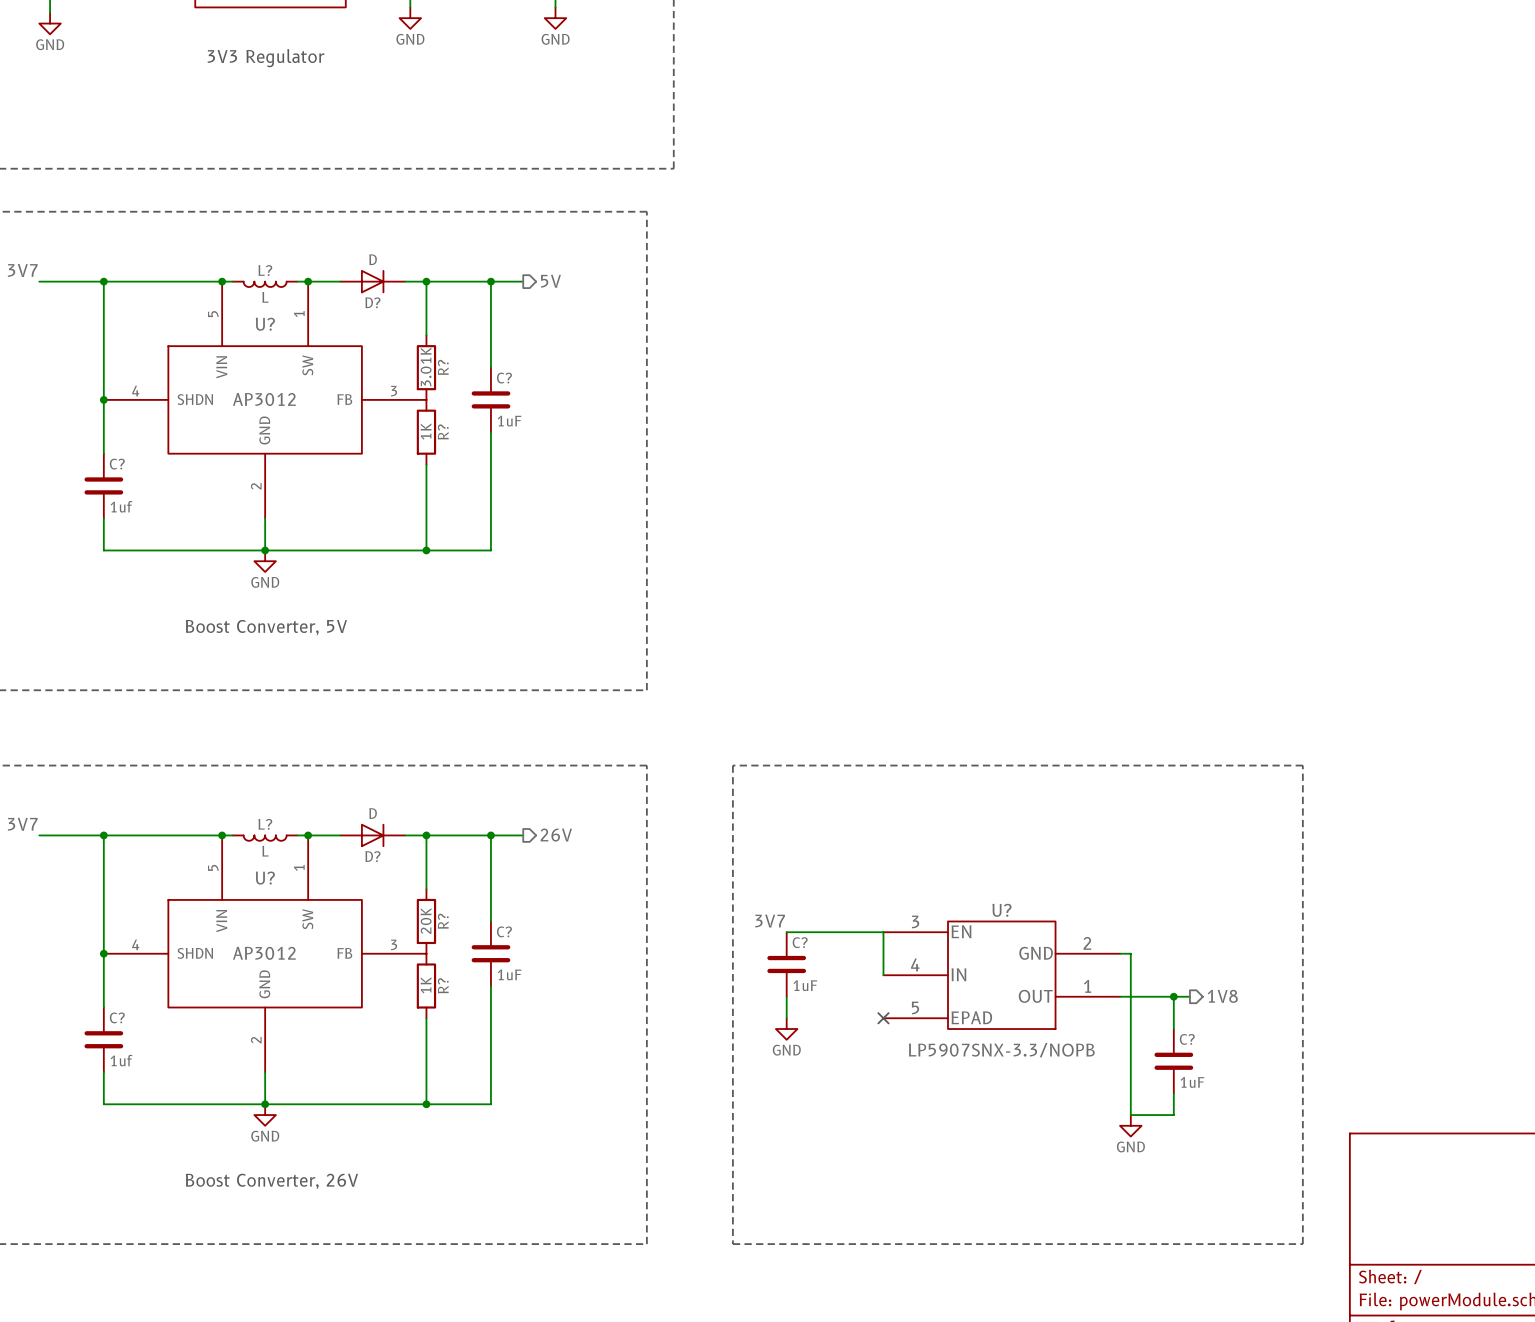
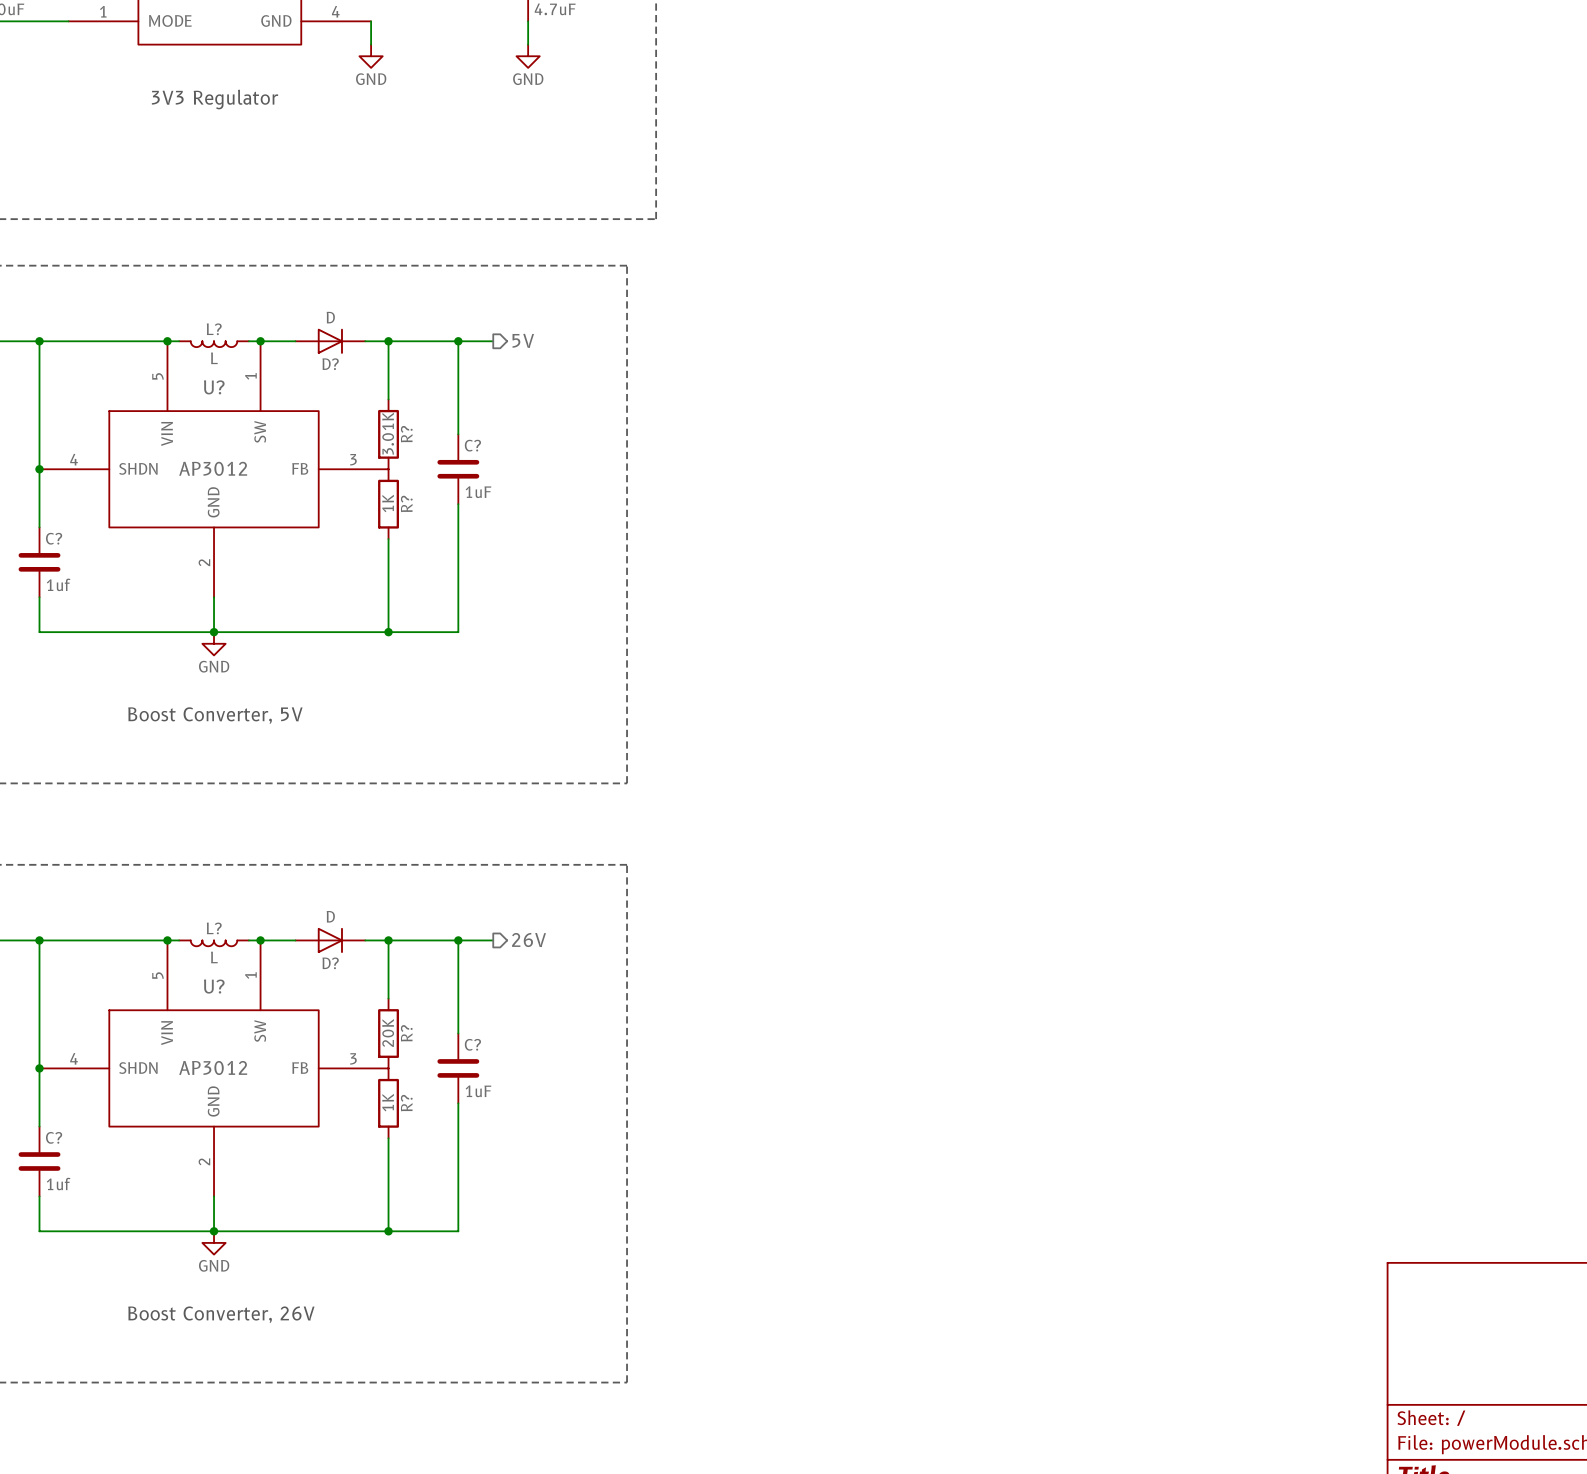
line: (732, 765) (732, 1244) (1302, 1244) (1302, 765) (732, 765) -> none
label: 3V7 (770, 921) -> none
wire: (786, 932) (883, 932) (883, 975) -> none
wire: (1120, 953) (1130, 953) (1130, 1115) (1173, 1115) (1173, 1093) -> none
C?: 1uF (786, 964) -> none
U?: LP5907SNX-3.3/NOPB (1001, 975) -> none
wire: (786, 996) (786, 1018) -> none
wire: (1120, 996) (1189, 996) -> none
wire: (1173, 996) (1173, 1029) -> none
junction: (1173, 996) -> none
hierarchical label: 1V8 (1222, 996) -> none
no-connect mark: (883, 1018) -> none
power symbol: GND (786, 1029) -> none
C?: 1uF (1173, 1061) -> none
power symbol: GND (1130, 1125) -> none

